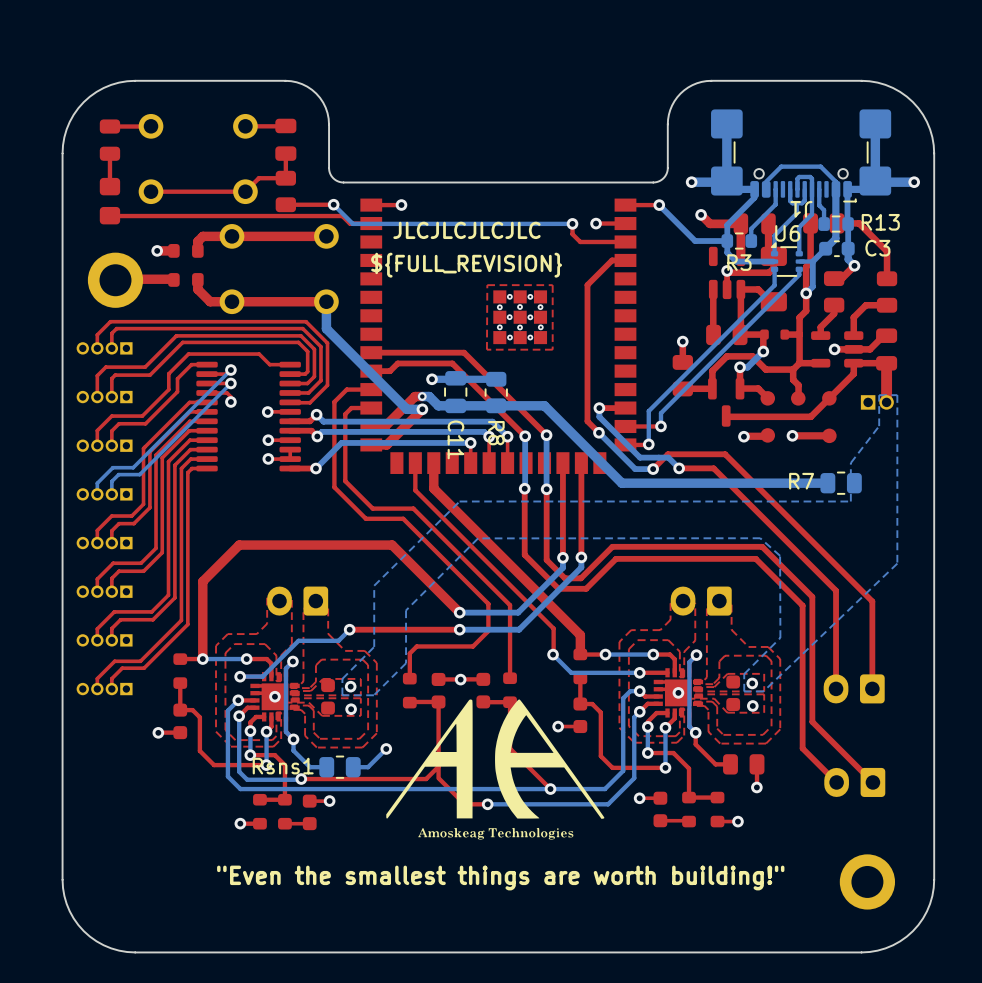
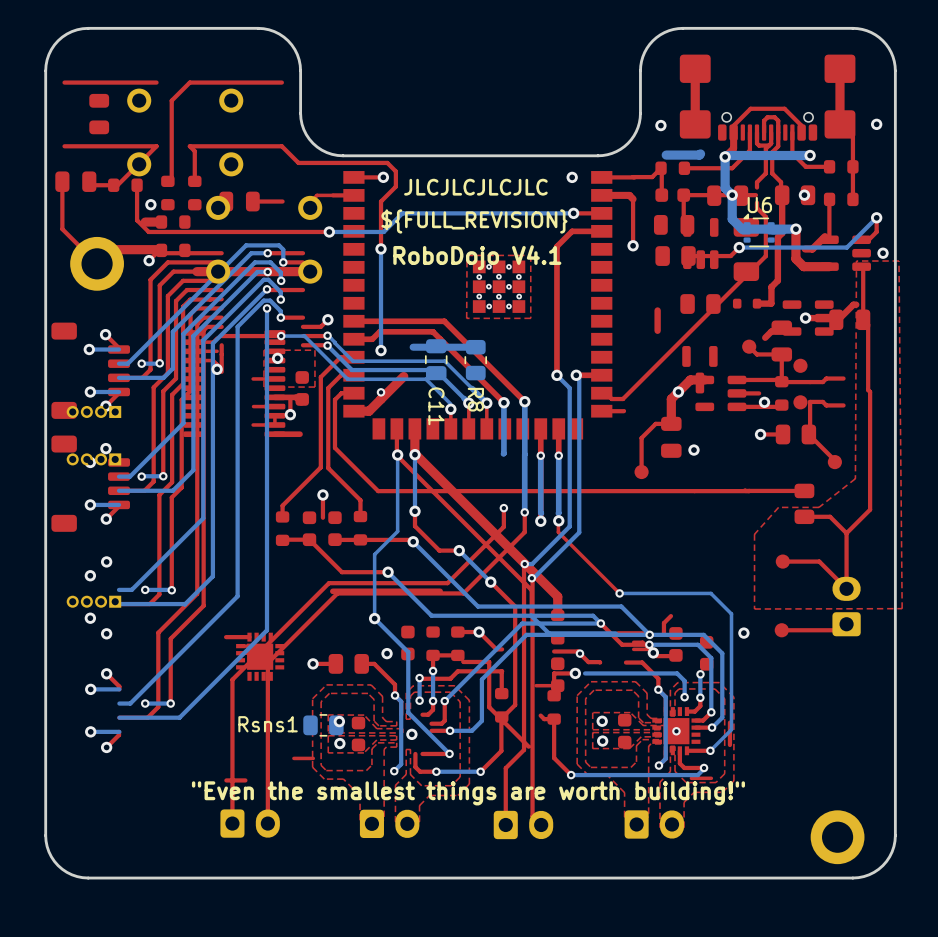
board edge: (861, 80) (711, 80) (692, 85) (680, 93) (670, 110) (667, 124) (667, 171) (662, 179) (653, 182) (340, 182) (333, 178) (329, 171) (329, 124) (325, 107) (311, 89) (291, 81) (127, 81) (103, 88) (83, 102) (73, 114) (66, 129) (62, 153) (62, 879) (64, 895) (69, 911) (83, 931) (96, 941) (111, 948) (135, 952) (861, 952) (885, 948) (900, 941) (912, 931) (923, 918) (930, 903) (934, 879) (933, 145) (927, 121) (912, 102) (893, 88) (877, 82) (861, 80) -> (852, 28) (871, 32) (882, 40) (892, 56) (895, 70) (895, 835) (892, 851) (882, 865) (869, 874) (852, 878) (88, 878) (71, 874) (58, 865) (48, 851) (45, 835) (45, 70) (48, 54) (58, 40) (71, 31) (88, 28) (269, 29) (283, 37) (297, 54) (300, 65) (302, 124) (313, 143) (326, 152) (343, 155) (597, 155) (612, 153) (620, 149) (631, 139) (636, 131) (640, 118) (641, 61) (649, 44) (664, 32) (682, 28) (852, 28)
top track: none -> (695, 68) (695, 124)
top track: none -> (839, 68) (839, 124) (852, 137) (852, 199)
top track: none -> (156, 82) (64, 82)
top track: none -> (281, 82) (189, 82) (171, 100) (171, 177) (167, 181)
bottom track: (726, 123) (726, 181) (735, 189) (754, 189) (754, 197) (727, 225) (727, 252) (736, 261) (773, 261) -> none
bottom track: (875, 123) (875, 181) -> none
top track: (285, 125) (245, 126) -> none
top track: (150, 126) (109, 126) -> none
part rotation: 0° (285, 139) -> 90° clockwise (75, 181)
part position: (285, 139) -> (75, 181)
via: none -> (876, 124)
via: none -> (660, 125)
top track: (109, 153) (109, 186) -> none
top track: (285, 153) (285, 178) (258, 178) (245, 191) (151, 191) -> none
J1 side: bottom (801, 155) -> top (767, 97)
top track: none -> (749, 132) (749, 150) (732, 168) (684, 168)
top track: none -> (757, 132) (757, 143) (759, 145) (769, 145)
top track: none -> (764, 132) (764, 120) (767, 117) (774, 117) (778, 120) (778, 146) (772, 152) (772, 173) (781, 182) (781, 187)
top track: none -> (771, 132) (771, 143) (765, 148) (765, 173) (757, 182) (757, 187)
top track: none -> (792, 132) (792, 153) (805, 166) (829, 166)
top track: none -> (801, 132) (801, 125) (784, 108) (750, 108) (733, 125) (733, 148) (725, 156)
top track: none -> (64, 146) (156, 146) (117, 185) (92, 185) (89, 181)
bottom track: (875, 181) (914, 182) -> none
bottom track: (875, 181) (866, 189) (847, 189) (848, 259) (854, 265) -> none
via: (691, 182) -> none
bottom track: none -> (810, 155) (725, 156) (725, 188) (732, 195) (732, 219) (742, 229) (795, 229)
via: none -> (810, 155)
via: (914, 182) -> none
via: none -> (725, 156)
bottom track: (766, 189) (766, 181) (781, 166) (820, 166) (835, 181) (835, 238) (825, 248) -> none
bottom track: (775, 189) (775, 204) (751, 228) (751, 241) -> none
bottom track: (797, 189) (797, 178) (799, 176) (810, 176) (812, 178) (812, 214) (799, 227) (798, 252) -> none
bottom track: (804, 189) (804, 200) (802, 203) (792, 203) (790, 201) (790, 189) -> none
bottom track: (819, 189) (819, 205) (824, 210) (824, 224) -> none
part: (285, 191) -> none
part: (109, 201) -> none
bottom track: (796, 203) (796, 213) (774, 235) (774, 253) -> none
top track: (333, 204) (285, 204) -> none
bottom track: (333, 204) (352, 223) (572, 223) -> none
via: (333, 204) -> none
top track: none -> (633, 177) (652, 177) (661, 168) (661, 195)
via: none -> (572, 177)
bottom track: (659, 205) (695, 241) (727, 241) -> none
via: (659, 205) -> none
top track: none -> (62, 181) (62, 229) (97, 263)
top track: none -> (194, 181) (194, 151) (189, 146) (281, 146) (298, 162) (387, 162) (395, 171) (395, 186) (381, 201) (381, 248)
part: none -> (125, 185)
top track: none -> (137, 185) (137, 220) (148, 231) (329, 231)
top track: (701, 214) (710, 223) (740, 223) (740, 256) -> none
via: (701, 214) -> none
top track: (109, 215) (342, 216) (349, 223) -> (310, 201) (317, 195) (333, 195)
part: none -> (167, 193)
part: none -> (194, 193)
top track: (572, 223) (572, 234) (580, 241) (596, 241) -> none
via: (572, 223) -> none
via: (596, 223) -> none
top track: (625, 223) (596, 223) -> (601, 195) (629, 195) (633, 199) (633, 245)
via: none -> (732, 195)
top track: (768, 223) (768, 250) (773, 256) (773, 267) (769, 272) (728, 272) (727, 270) (727, 289) -> none
top track: none -> (755, 195) (683, 195) (683, 219) (688, 224)
via: none -> (804, 195)
top track: (837, 223) (859, 223) (887, 251) (887, 278) -> none
R13 side: bottom (836, 224) -> top (672, 168)
top track: none -> (829, 199) (829, 239)
part: none -> (841, 199)
part: none -> (239, 201)
top track: none -> (282, 201) (252, 201)
text position: JLCJLCJLCJLC (466, 230) -> JLCJLCJLCJLC (475, 187)
top track: (326, 236) (202, 236) (197, 241) (197, 250) -> none
bottom track: none -> (573, 213) (402, 213) (383, 231) (329, 231)
via: none -> (573, 213)
R3 side: bottom (739, 241) -> top (841, 166)
top track: none -> (876, 217) (876, 231) (868, 239) (861, 239)
bottom track: none -> (876, 217) (846, 247) (739, 247)
via: none -> (876, 217)
bottom track: (825, 248) (812, 261) (812, 286) (806, 293) -> none
C3 side: bottom (836, 248) -> top (672, 195)
via position: (157, 250) -> (150, 204)
part: none -> (674, 224)
top track: none -> (795, 229) (795, 258) (803, 266) (829, 266)
via: none -> (795, 229)
top track: (612, 260) (587, 285) (587, 421) (598, 432) -> (588, 231) (572, 231) (556, 246) (556, 375)
via: none -> (329, 231)
text position: ${FULL_REVISION} (466, 265) -> ${FULL_REVISION} (474, 221)
via: (854, 265) -> none
bottom track: (774, 269) (774, 285) (648, 411) (648, 444) -> none
bottom track: (799, 269) (799, 274) (660, 413) (660, 426) -> none
via: (727, 270) -> none
via: none -> (633, 245)
top track: none -> (739, 247) (730, 256) (688, 256)
via: none -> (739, 247)
bottom track: none -> (381, 248) (381, 350)
via: none -> (381, 248)
top track: (197, 279) (197, 289) (210, 301) -> (159, 363) (159, 285) (173, 271) (196, 271)
part position: (115, 280) -> (97, 263)
top track: none -> (221, 253) (156, 253) (149, 260)
bottom track: none -> (267, 253) (251, 253) (172, 331) (172, 368) (163, 377) (119, 377)
via: none -> (267, 253)
top track: none -> (302, 253) (267, 253)
part: none -> (845, 253)
via: none -> (883, 253)
part: none -> (675, 256)
text: none -> RoboDojo V4.1 (477, 257)
top track: (713, 289) (713, 334) -> none
via: none -> (149, 260)
top zone outline: none -> (898, 261) (856, 261) (855, 478) (818, 507) (778, 507) (754, 534) (754, 609) (902, 608) (898, 261)
part: (834, 291) -> none
top track: none -> (221, 262) (167, 262) (150, 279) (150, 369) (142, 377) (119, 377)
bottom track: none -> (283, 262) (283, 249) (279, 245) (246, 245) (127, 363) (119, 363)
via: none -> (283, 262)
top track: none -> (302, 262) (283, 262)
part: (887, 292) -> none
via: (806, 293) -> none
top track: none -> (861, 266) (863, 268) (863, 319) (868, 324) (870, 509) (846, 533)
bottom track: (326, 301) (326, 328) (406, 409) (422, 409) -> none
top track: (773, 301) (770, 301) (758, 289) (740, 289) (740, 335) -> none
bottom track: none -> (267, 271) (257, 271) (193, 336) (193, 470) (172, 490) (119, 490)
via: none -> (267, 271)
top track: (834, 305) (834, 313) (820, 327) (820, 335) -> none
top track: (887, 305) (865, 305) (853, 317) (853, 335) -> none
top track: none -> (221, 280) (183, 280) (167, 296) (167, 373) (153, 387) (153, 481) (144, 490) (119, 490)
bottom track: none -> (281, 280) (280, 272) (270, 262) (254, 262) (183, 333) (183, 423) (130, 476) (119, 476)
via: none -> (281, 280)
top track: none -> (267, 289) (302, 290)
bottom track: none -> (267, 289) (212, 343) (212, 576) (184, 604) (119, 604)
via: none -> (267, 289)
top track: none -> (221, 290) (187, 290) (176, 301) (176, 378) (163, 391) (163, 476)
top track: none -> (221, 299) (190, 299) (183, 306) (183, 383) (172, 394) (172, 482) (159, 495) (159, 594) (149, 604) (119, 604)
bottom track: none -> (280, 299) (280, 292) (268, 279) (263, 279) (203, 340) (203, 518) (131, 589) (119, 589)
via: none -> (280, 299)
top track: (740, 334) (764, 334) (763, 351) -> none
top track: (799, 334) (799, 363) -> none
top track: none -> (221, 308) (196, 308) (190, 314) (190, 390) (181, 399) (181, 487) (171, 497) (171, 590)
bottom track: none -> (267, 308) (267, 630) (179, 717) (119, 717)
via: none -> (267, 308)
via: (682, 341) -> none
top track: (97, 348) (97, 334) (110, 321) (306, 321) (327, 343) (327, 385) (310, 402) (294, 402) -> none
part: (104, 348) -> none
top track: (111, 348) (111, 333) (116, 328) (302, 328) (320, 346) (320, 380) (308, 392) (290, 392) -> none
top track: none -> (221, 317) (203, 317) (197, 324) (197, 593) (158, 632) (158, 707) (147, 717) (119, 717)
bottom track: none -> (280, 317) (280, 311) (270, 300) (263, 300) (237, 326) (237, 596) (130, 703) (119, 703)
via: none -> (280, 317)
top track: none -> (302, 317) (280, 317)
part rotation: 0° (886, 349) -> 90° clockwise (849, 319)
top track: none -> (327, 319) (320, 326) (302, 326)
via: none -> (327, 319)
bottom track: (763, 351) (747, 367) (740, 367) -> none
via: (763, 351) -> none
top track: none -> (221, 326) (207, 326) (203, 330) (203, 605) (170, 638) (170, 703)
top track: (886, 363) (853, 363) (853, 373) (810, 416) (726, 416) -> none
top track: (886, 363) (886, 402) -> none
top track: (207, 364) (191, 364) (177, 378) (177, 391) (145, 423) (119, 423) (111, 430) (111, 445) -> none
top track: (290, 364) (269, 364) (259, 354) (188, 354) (168, 373) (168, 389) (142, 416) (111, 416) (97, 430) (97, 445) -> none
top track: none -> (105, 334) (119, 349)
via: none -> (105, 334)
top track: none -> (281, 336) (221, 336)
bottom track: none -> (281, 336) (304, 336) (347, 379) (425, 379) (450, 404)
via: none -> (281, 336)
top track: none -> (327, 335) (302, 336)
via: none -> (327, 335)
top track: (740, 367) (740, 388) (758, 388) (764, 395) (764, 398) -> none
via: (740, 367) -> none
bottom track: (230, 370) (133, 467) (112, 467) (97, 483) (97, 494) -> none
via: (230, 370) -> none
part: none -> (781, 341)
top track: (290, 374) (305, 374) (307, 371) (307, 351) (298, 342) (182, 342) (150, 375) (115, 375) (111, 378) (111, 397) -> none
part: (682, 375) -> none
top track: none -> (221, 345) (221, 371)
top track: none -> (302, 345) (327, 345)
via: none -> (327, 345)
top track: none -> (749, 346) (757, 354) (781, 354) (781, 381)
part: none -> (749, 346)
via: (432, 379) -> none
via: none -> (89, 349)
bottom track: none -> (119, 349) (89, 349)
top zone outline: none -> (314, 350) (263, 350) (263, 387) (314, 387) (314, 350)
via: none -> (381, 350)
bottom track: (230, 383) (139, 474) (118, 474) (111, 481) (111, 494) -> none
via: (230, 383) -> none
top track: (290, 383) (307, 383) (314, 376) (314, 349) (301, 335) (176, 335) (145, 367) (105, 367) (97, 375) (97, 397) -> none
top track: (682, 388) (712, 388) (712, 370) (726, 356) (752, 356) (765, 369) (793, 369) (793, 379) (798, 385) (798, 398) -> none
top track: (357, 389) (346, 389) (334, 401) (334, 487) (365, 518) (403, 518) (488, 603) (488, 631) (473, 646) (416, 646) (409, 653) (409, 678) -> (340, 357) (320, 377) (320, 467) (282, 505) (282, 516)
part footprint: [76, 390, 133, 404] -> [51, 322, 131, 419]
via: none -> (277, 358)
bottom track: none -> (159, 363) (141, 363)
via: none -> (159, 363)
bottom zone outline: (897, 395) (879, 395) (879, 426) (850, 463) (850, 501) (459, 501) (374, 585) (374, 646) (342, 678) (342, 695) (373, 695) (406, 663) (406, 610) (478, 538) (760, 538) (780, 555) (780, 637) (744, 674) (744, 691) (763, 691) (897, 563) (897, 395) -> none
via: none -> (141, 363)
top track: (422, 396) (415, 396) (385, 426) (371, 426) -> (749, 491) (378, 491) (334, 447) (334, 399) (341, 393) (353, 393)
bottom track: (422, 396) (429, 396) (438, 405) (544, 405) (621, 483) (827, 483) -> none
via position: (422, 396) -> (381, 392)
part: (767, 398) -> none
part: (798, 398) -> none
top track: (207, 402) (189, 402) (143, 448) (143, 504) (131, 516) (111, 516) (97, 530) (97, 543) -> none
part: (877, 402) -> none
top track: (358, 408) (351, 408) (345, 414) (345, 481) (372, 508) (413, 508) (510, 605) (510, 678) -> (341, 375) (328, 388) (328, 468) (360, 500) (360, 516)
bottom track: none -> (556, 375) (569, 388) (569, 526) (532, 564) (524, 564)
bottom track: (599, 408) (599, 416) (640, 457) (668, 457) (679, 468) -> none
bottom track: none -> (579, 375) (579, 532) (531, 578)
via: (422, 409) -> none
top track: (207, 411) (190, 411) (149, 452) (149, 507) (133, 523) (119, 523) (111, 530) (111, 543) -> none
top track: none -> (843, 378) (826, 378) (822, 382) (736, 379)
via: (267, 412) -> none
top track: none -> (704, 379) (690, 379) (671, 399) (671, 423) (655, 423) (641, 438) (641, 472)
top track: (316, 414) (310, 421) (290, 421) -> none
bottom track: (316, 414) (323, 421) (492, 421) -> (327, 335) (353, 361) (444, 361) (472, 388)
via: (316, 414) -> none
top track: (207, 421) (189, 421) (156, 455) (156, 548) (141, 563) (113, 563) (97, 579) (97, 591) -> none
part: none -> (302, 388)
via: none -> (90, 391)
top track: none -> (119, 391) (105, 406)
bottom track: none -> (119, 391) (90, 391)
via: none -> (678, 391)
top track: (660, 426) (629, 426) -> (757, 202) (757, 208) (765, 216) (765, 256) (622, 399) (611, 399) (605, 393)
via: (660, 426) -> none
part: none -> (720, 393)
top track: none -> (759, 393) (736, 393)
part: none -> (781, 393)
top track: (207, 430) (189, 430) (162, 457) (162, 552) (143, 571) (119, 571) (111, 578) (111, 591) -> none
bottom track: (484, 431) (321, 431) (317, 436) -> (464, 398) (435, 370) (351, 370) (327, 345)
top track: none -> (290, 399) (290, 414)
bottom track: (598, 432) (635, 469) (653, 469) -> none
via position: (598, 432) -> (556, 375)
part: (767, 435) -> none
top track: (829, 435) (792, 435) -> none
via: (317, 436) -> none
via: (743, 436) -> none
top track: (767, 436) (743, 436) -> none
top track: none -> (781, 405) (780, 406) (736, 406)
via: none -> (105, 406)
top track: none -> (843, 405) (826, 405) (822, 401) (810, 401) (810, 437)
top track: (207, 440) (189, 440) (168, 461) (168, 595) (151, 611) (114, 611) (97, 628) (97, 640) -> none
via: (268, 440) -> none
bottom track: (470, 442) (341, 442) (315, 468) -> none
via: (648, 444) -> none
via: none -> (290, 414)
top track: (207, 449) (190, 449) (174, 465) (174, 597) (152, 619) (120, 619) (111, 628) (111, 640) -> none
via: (268, 458) -> none
top track: (207, 459) (190, 459) (181, 468) (181, 620) (140, 661) (114, 661) (97, 678) (97, 689) -> none
top track: (207, 468) (191, 468) (187, 472) (187, 624) (144, 668) (122, 668) (111, 678) (111, 689) -> none
via: (315, 468) -> none
top track: (679, 468) (713, 468) (836, 590) (836, 688) -> none
via: (679, 468) -> none
via: none -> (760, 434)
top track: none -> (783, 434) (760, 434)
part: none -> (795, 434)
top track: none -> (808, 434) (834, 462)
top track: (653, 469) (667, 454) (725, 454) (872, 601) (872, 688) -> none
via: (653, 469) -> none
part: none -> (671, 437)
via: none -> (105, 448)
R7 side: bottom (841, 483) -> top (804, 503)
via: none -> (693, 450)
top track: (524, 488) (524, 554) (558, 588) (586, 588) (616, 558) (755, 558) (802, 605) (802, 748) (836, 782) -> none
via: (524, 488) -> none
bottom track: none -> (397, 455) (397, 531) (374, 554) (374, 618) (408, 652) (408, 712) (449, 753)
via: none -> (397, 455)
bottom track: none -> (415, 454) (415, 511)
via: none -> (415, 454)
top track: (546, 489) (546, 560) (564, 578) (580, 578) (612, 546) (762, 546) (812, 596) (812, 721) (872, 782) -> none
bottom track: none -> (524, 454) (524, 512)
via: (546, 489) -> none
bottom track: none -> (540, 455) (541, 513)
via: none -> (540, 455)
top track: (581, 490) (581, 557) -> none
bottom track: none -> (558, 455) (558, 513)
via: none -> (558, 455)
via: none -> (90, 462)
part: none -> (834, 462)
part: none -> (641, 472)
bottom track: none -> (163, 476) (141, 476)
via: none -> (163, 476)
via: none -> (141, 476)
part: none -> (90, 483)
top track: none -> (744, 490) (804, 490)
top track: none -> (322, 495) (322, 517)
via: none -> (322, 495)
via: none -> (90, 504)
top track: none -> (119, 505) (106, 519)
bottom track: none -> (119, 504) (90, 504)
part: (104, 543) -> none
top track: none -> (503, 508) (503, 526) (447, 583) (328, 583) (232, 679) (232, 823)
via: none -> (503, 508)
top track: none -> (415, 511) (415, 526) (439, 550) (459, 550)
via: none -> (415, 511)
top track: none -> (524, 512) (524, 532) (463, 593) (337, 593) (267, 663) (267, 823)
via: none -> (524, 512)
top track: none -> (558, 513) (558, 532) (619, 593)
top track: none -> (804, 516) (830, 516) (846, 533)
via: none -> (106, 519)
bottom track: (562, 557) (562, 567) (518, 612) (459, 612) -> none
bottom track: (581, 557) (581, 567) (519, 629) (459, 629) -> none
part: none -> (360, 528)
part: none -> (282, 528)
part: none -> (309, 528)
part: none -> (334, 528)
top track: none -> (846, 533) (846, 588) (819, 561) (782, 561)
top track: none -> (309, 539) (342, 572) (388, 572)
top track: none -> (336, 539) (411, 539) (413, 541)
top track: none -> (282, 540) (311, 540)
bottom track: none -> (413, 541) (478, 606) (621, 606) (649, 634)
via: none -> (413, 541)
bottom track: none -> (459, 550) (490, 582)
via: none -> (459, 550)
part: (104, 591) -> none
top zone outline: (291, 597) (291, 644) (281, 655) (281, 681) (276, 681) (276, 655) (264, 644) (234, 644) (225, 653) (225, 730) (235, 740) (272, 740) (276, 736) (276, 712) (281, 712) (281, 739) (273, 746) (230, 746) (216, 731) (216, 645) (227, 634) (256, 634) (267, 623) (267, 597) (291, 597) -> none
via: none -> (106, 561)
part: none -> (782, 561)
part: (297, 601) -> none
top track: none -> (524, 564) (524, 749) (505, 768) (505, 824)
via: none -> (524, 564)
part: (701, 601) -> none
top zone outline: (695, 603) (695, 640) (684, 651) (684, 677) (679, 677) (679, 651) (668, 640) (637, 640) (628, 649) (628, 726) (638, 736) (675, 736) (679, 732) (679, 708) (684, 708) (684, 735) (676, 742) (634, 742) (619, 727) (619, 641) (631, 630) (660, 630) (670, 619) (670, 603) (695, 603) -> none
top zone outline: (731, 604) (706, 604) (706, 677) (704, 679) (693, 679) (693, 684) (713, 684) (719, 677) (719, 661) (725, 655) (766, 655) (771, 661) (771, 726) (762, 734) (723, 734) (717, 728) (717, 706) (712, 701) (693, 701) (693, 705) (704, 705) (708, 709) (708, 731) (720, 743) (766, 743) (780, 729) (780, 659) (768, 646) (748, 646) (731, 629) (731, 604) -> none
top zone outline: (328, 608) (303, 608) (303, 681) (301, 683) (290, 683) (290, 688) (309, 688) (315, 681) (315, 665) (321, 659) (362, 659) (368, 665) (368, 730) (359, 738) (320, 738) (313, 732) (313, 710) (308, 705) (290, 705) (290, 709) (301, 709) (305, 713) (305, 735) (316, 747) (362, 747) (376, 733) (376, 662) (364, 650) (345, 650) (328, 633) (328, 608) -> none
bottom track: none -> (388, 572) (431, 615) (593, 615) (600, 623) (522, 623) (444, 701)
via: none -> (388, 572)
top track: (459, 612) (392, 545) (239, 545) (202, 581) (202, 659) (180, 659) -> none
via: (459, 612) -> none
via: none -> (90, 575)
top track: none -> (531, 578) (532, 816) (541, 824)
via: none -> (531, 578)
top track: none -> (490, 582) (515, 606) (515, 704) (501, 717) (501, 750) (480, 771)
via: none -> (490, 582)
bottom track: none -> (145, 589) (171, 590)
via: none -> (145, 589)
via: none -> (171, 590)
bottom track: (349, 629) (338, 640) (298, 640) (262, 676) (240, 676) -> none
via: (349, 629) -> none
via: (459, 629) -> none
bottom track: none -> (619, 593) (710, 593) (731, 613) (731, 729) (710, 750)
via: none -> (619, 593)
bottom track: (655, 652) (653, 654) (605, 654) -> none
via: (553, 654) -> none
top track: (605, 654) (580, 654) -> none
via: (605, 654) -> none
top track: (653, 654) (669, 654) (674, 659) (674, 672) -> none
via: (653, 654) -> none
bottom track: (696, 655) (689, 662) (689, 726) (695, 732) -> none
via: (696, 655) -> none
via: none -> (90, 618)
via: none -> (374, 618)
via: (202, 659) -> none
top track: (246, 659) (266, 659) (271, 663) (271, 676) -> none
bottom track: (246, 659) (202, 659) -> none
via: (246, 659) -> none
bottom track: (292, 661) (285, 668) (285, 731) (293, 739) (293, 750) (310, 767) (326, 767) -> none
via: (292, 661) -> none
top track: none -> (600, 623) (622, 644) (649, 644)
via: none -> (600, 623)
top track: none -> (846, 624) (840, 630) (781, 630)
part: none -> (781, 630)
part: (180, 671) -> none
top track: none -> (457, 632) (479, 632) (496, 649) (502, 649)
via: none -> (479, 632)
part footprint: [476, 672, 491, 709] -> [451, 626, 465, 662]
via: (639, 672) -> none
via: none -> (743, 633)
via: none -> (106, 633)
top zone outline: (764, 673) (764, 691) (694, 691) (694, 687) (714, 687) (727, 673) (764, 673) -> none
via: none -> (649, 634)
via: (240, 676) -> none
top zone outline: (360, 678) (360, 695) (290, 695) (290, 691) (311, 691) (323, 678) (360, 678) -> none
top track: (580, 678) (580, 704) (592, 704) (600, 712) (600, 756) (612, 767) (665, 767) -> none
top track: (460, 679) (438, 679) -> none
via: (460, 679) -> none
top track: (483, 679) (460, 679) -> none
top track: (180, 683) (180, 710) (192, 710) (199, 717) (199, 750) (214, 765) (266, 765) -> none
part: none -> (433, 643)
via: (752, 683) -> none
bottom track: none -> (649, 644) (697, 644) (711, 658) (711, 712)
via: none -> (649, 644)
part: none -> (675, 644)
via: (350, 686) -> none
part rotation: 0° (854, 688) -> 90° clockwise (846, 606)
part position: (854, 688) -> (846, 606)
part: (104, 689) -> none
part: (409, 690) -> none
part position: (438, 690) -> (407, 643)
part: (510, 690) -> none
top track: none -> (554, 651) (577, 651) (588, 662) (600, 662)
top track: (639, 691) (645, 696) (658, 696) -> none
bottom track: (639, 691) (630, 691) (623, 698) (623, 770) (604, 789) (240, 789) (227, 776) (227, 710) (238, 700) -> none
via: (639, 691) -> none
part position: (678, 692) -> (676, 731)
via: none -> (387, 653)
via: none -> (579, 653)
top zone outline: (764, 694) (764, 712) (727, 712) (714, 698) (687, 698) (687, 694) (764, 694) -> none
top track: none -> (457, 655) (433, 655) (433, 670)
via: (274, 696) -> none
part: (328, 696) -> none
top track: none -> (675, 656) (656, 656)
top zone outline: (360, 698) (360, 715) (322, 715) (308, 702) (284, 702) (284, 698) (360, 698) -> none
drawing: [386, 699, 605, 840] -> none
via: (238, 700) -> none
top track: (254, 700) (238, 700) -> none
top track: (438, 701) (438, 778) (464, 804) (487, 804) -> none
top track: (438, 701) (409, 702) -> none
top track: none -> (625, 662) (642, 662) (658, 678) (658, 689) (665, 697) (665, 711)
top track: (658, 703) (647, 703) (639, 711) -> none
via: none -> (313, 663)
top track: none -> (335, 663) (313, 663)
part: none -> (348, 663)
top track: none -> (361, 663) (374, 663) (395, 684) (395, 695) (401, 701) (401, 714)
via: (752, 705) -> none
top track: (254, 707) (247, 707) (239, 716) -> none
via: (351, 709) -> none
bottom track: none -> (433, 670) (433, 701)
via: none -> (433, 670)
bottom track: (639, 711) (634, 717) (634, 778) (608, 804) (487, 804) -> none
via: (639, 711) -> none
top track: none -> (575, 673) (554, 673) (554, 695)
via: none -> (575, 673)
bottom track: none -> (585, 673) (677, 673) (684, 680) (684, 697)
top track: (667, 713) (656, 713) (647, 721) (647, 726) -> none
top track: (674, 713) (674, 718) (665, 727) -> none
top track: (689, 713) (689, 726) (695, 732) (695, 744) (715, 764) (730, 764) -> none
top track: none -> (106, 673) (119, 686) (119, 689)
via: none -> (106, 673)
bottom track: none -> (700, 674) (700, 697)
via: none -> (700, 674)
bottom track: (239, 716) (239, 771) (247, 779) (301, 779) -> none
via: (239, 716) -> none
top track: (264, 716) (256, 716) (250, 722) (250, 731) -> none
top track: (271, 716) (271, 726) (266, 731) -> none
top track: none -> (419, 678) (450, 678) (457, 671) (502, 671) (501, 693)
bottom track: none -> (419, 678) (419, 700)
via: none -> (419, 678)
part: (180, 721) -> none
top zone outline: none -> (635, 681) (591, 681) (577, 695) (577, 764) (588, 775) (608, 775) (624, 792) (624, 817) (648, 817) (648, 746) (650, 743) (661, 743) (661, 739) (642, 739) (636, 745) (636, 761) (630, 767) (590, 767) (585, 762) (585, 698) (594, 690) (632, 690) (638, 696) (638, 717) (643, 722) (661, 722) (661, 718) (650, 718) (647, 714) (647, 693) (635, 681)
top zone outline: none -> (719, 682) (733, 697) (733, 780) (722, 792) (694, 792) (684, 802) (684, 827) (659, 827) (659, 782) (670, 771) (670, 746) (675, 746) (675, 771) (686, 782) (715, 782) (724, 773) (724, 698) (714, 688) (678, 688) (675, 692) (675, 716) (670, 716) (670, 690) (677, 682) (719, 682)
top zone outline: none -> (371, 684) (326, 684) (312, 698) (312, 767) (324, 779) (343, 779) (360, 795) (360, 820) (384, 820) (384, 749) (386, 747) (396, 747) (396, 742) (378, 742) (371, 748) (371, 765) (366, 770) (326, 770) (321, 765) (321, 701) (329, 693) (367, 693) (374, 699) (374, 721) (378, 725) (396, 725) (396, 721) (386, 721) (382, 717) (382, 696) (371, 684)
top zone outline: none -> (454, 685) (469, 700) (469, 784) (457, 795) (429, 795) (419, 805) (419, 821) (395, 821) (395, 785) (406, 774) (406, 749) (410, 749) (410, 774) (421, 785) (451, 785) (460, 776) (460, 701) (450, 692) (414, 692) (410, 696) (410, 719) (406, 719) (406, 692) (413, 685) (454, 685)
via: (558, 726) -> none
bottom track: (647, 726) (647, 753) -> none
via: (647, 726) -> none
bottom track: (665, 727) (665, 767) -> none
via: (665, 727) -> none
via: none -> (90, 689)
bottom track: none -> (119, 689) (90, 689)
bottom track: none -> (658, 689) (665, 697) (665, 758) (658, 765)
via: none -> (658, 689)
bottom track: (250, 731) (250, 755) -> none
via: (250, 731) -> none
bottom track: (266, 731) (266, 764) -> none
via: (266, 731) -> none
via: (158, 732) -> none
top track: (180, 732) (158, 732) -> none
via: (695, 732) -> none
bottom track: none -> (395, 695) (401, 701) (401, 764) (394, 771)
via: none -> (395, 695)
via: none -> (684, 697)
top track: none -> (700, 697) (700, 706) (694, 711) (686, 711)
via: none -> (700, 697)
via: (293, 739) -> none
via: none -> (419, 700)
top track: none -> (433, 701) (433, 709) (428, 714) (422, 714)
via: none -> (433, 701)
top track: none -> (444, 701) (444, 720) (441, 723) (431, 723)
via: none -> (444, 701)
via: none -> (145, 703)
bottom track: none -> (170, 703) (145, 703)
via: none -> (170, 703)
part: none -> (501, 705)
bottom track: (386, 748) (368, 767) (353, 767) -> none
via: (386, 748) -> none
part: none -> (554, 707)
top track: (249, 753) (250, 755) (274, 755) (284, 765) (284, 799) (259, 799) -> none
top track: (647, 753) (673, 753) (689, 768) (689, 797) (717, 797) -> none
via: (647, 753) -> none
top track: none -> (711, 712) (703, 720) (695, 720)
via: none -> (711, 712)
top zone outline: none -> (630, 712) (643, 725) (666, 725) (666, 729) (592, 729) (592, 712) (630, 712)
via: (250, 755) -> none
top zone outline: none -> (364, 715) (376, 728) (402, 728) (402, 732) (328, 732) (328, 714) (364, 715)
top track: none -> (540, 715) (544, 719) (554, 719) (554, 758) (571, 775)
via: none -> (602, 721)
via: none -> (339, 721)
part: (743, 764) -> none
via: (266, 765) -> none
top track: (438, 766) (426, 779) (301, 779) -> none
via: (665, 767) -> none
top track: none -> (712, 727) (695, 727)
bottom track: none -> (712, 727) (722, 717) (722, 653) (703, 634) (526, 634) (481, 679) (481, 720) (472, 730) (450, 730)
via: none -> (712, 727)
top track: none -> (450, 730) (431, 730)
via: none -> (450, 730)
via: none -> (90, 731)
top track: none -> (119, 731) (119, 735) (106, 747)
bottom track: none -> (119, 731) (90, 731)
via: none -> (676, 731)
top zone outline: none -> (661, 732) (592, 732) (592, 748) (629, 748) (641, 736) (661, 736) (661, 732)
part: none -> (358, 733)
via: none -> (411, 734)
top zone outline: none -> (396, 735) (328, 735) (328, 752) (363, 752) (376, 740) (396, 740) (396, 735)
via: (301, 779) -> none
part: (854, 782) -> none
via: none -> (602, 741)
via: none -> (339, 743)
via: (756, 787) -> none
via: none -> (106, 747)
via: (550, 789) -> none
top track: none -> (679, 750) (679, 763) (684, 767) (704, 767)
top track: none -> (710, 750) (686, 750)
via: none -> (710, 750)
top track: none -> (415, 753) (415, 767) (420, 771) (436, 771)
top track: none -> (447, 753) (422, 753)
via: none -> (449, 753)
via: (639, 798) -> none
top track: (640, 798) (660, 798) -> none
via: (329, 801) -> none
via: (487, 804) -> none
via: none -> (658, 765)
part position: (660, 809) -> (624, 731)
part: (689, 809) -> none
part: (717, 809) -> none
bottom track: none -> (704, 767) (697, 775) (571, 775)
via: none -> (704, 767)
part: (259, 811) -> none
part: (284, 811) -> none
part: (309, 812) -> none
via: none -> (394, 771)
via: none -> (436, 771)
bottom track: none -> (480, 771) (436, 771)
via: none -> (480, 771)
via: none -> (571, 775)
top track: (689, 821) (660, 821) -> none
via: (737, 821) -> none
via: (240, 823) -> none
top track: (309, 823) (284, 823) -> none
part: none -> (250, 823)
part: none -> (389, 823)
part: none -> (654, 824)
part: none -> (523, 824)
text position: "Even the smallest things are worth building!" (500, 878) -> "Even the smallest things are worth building!" (468, 793)

